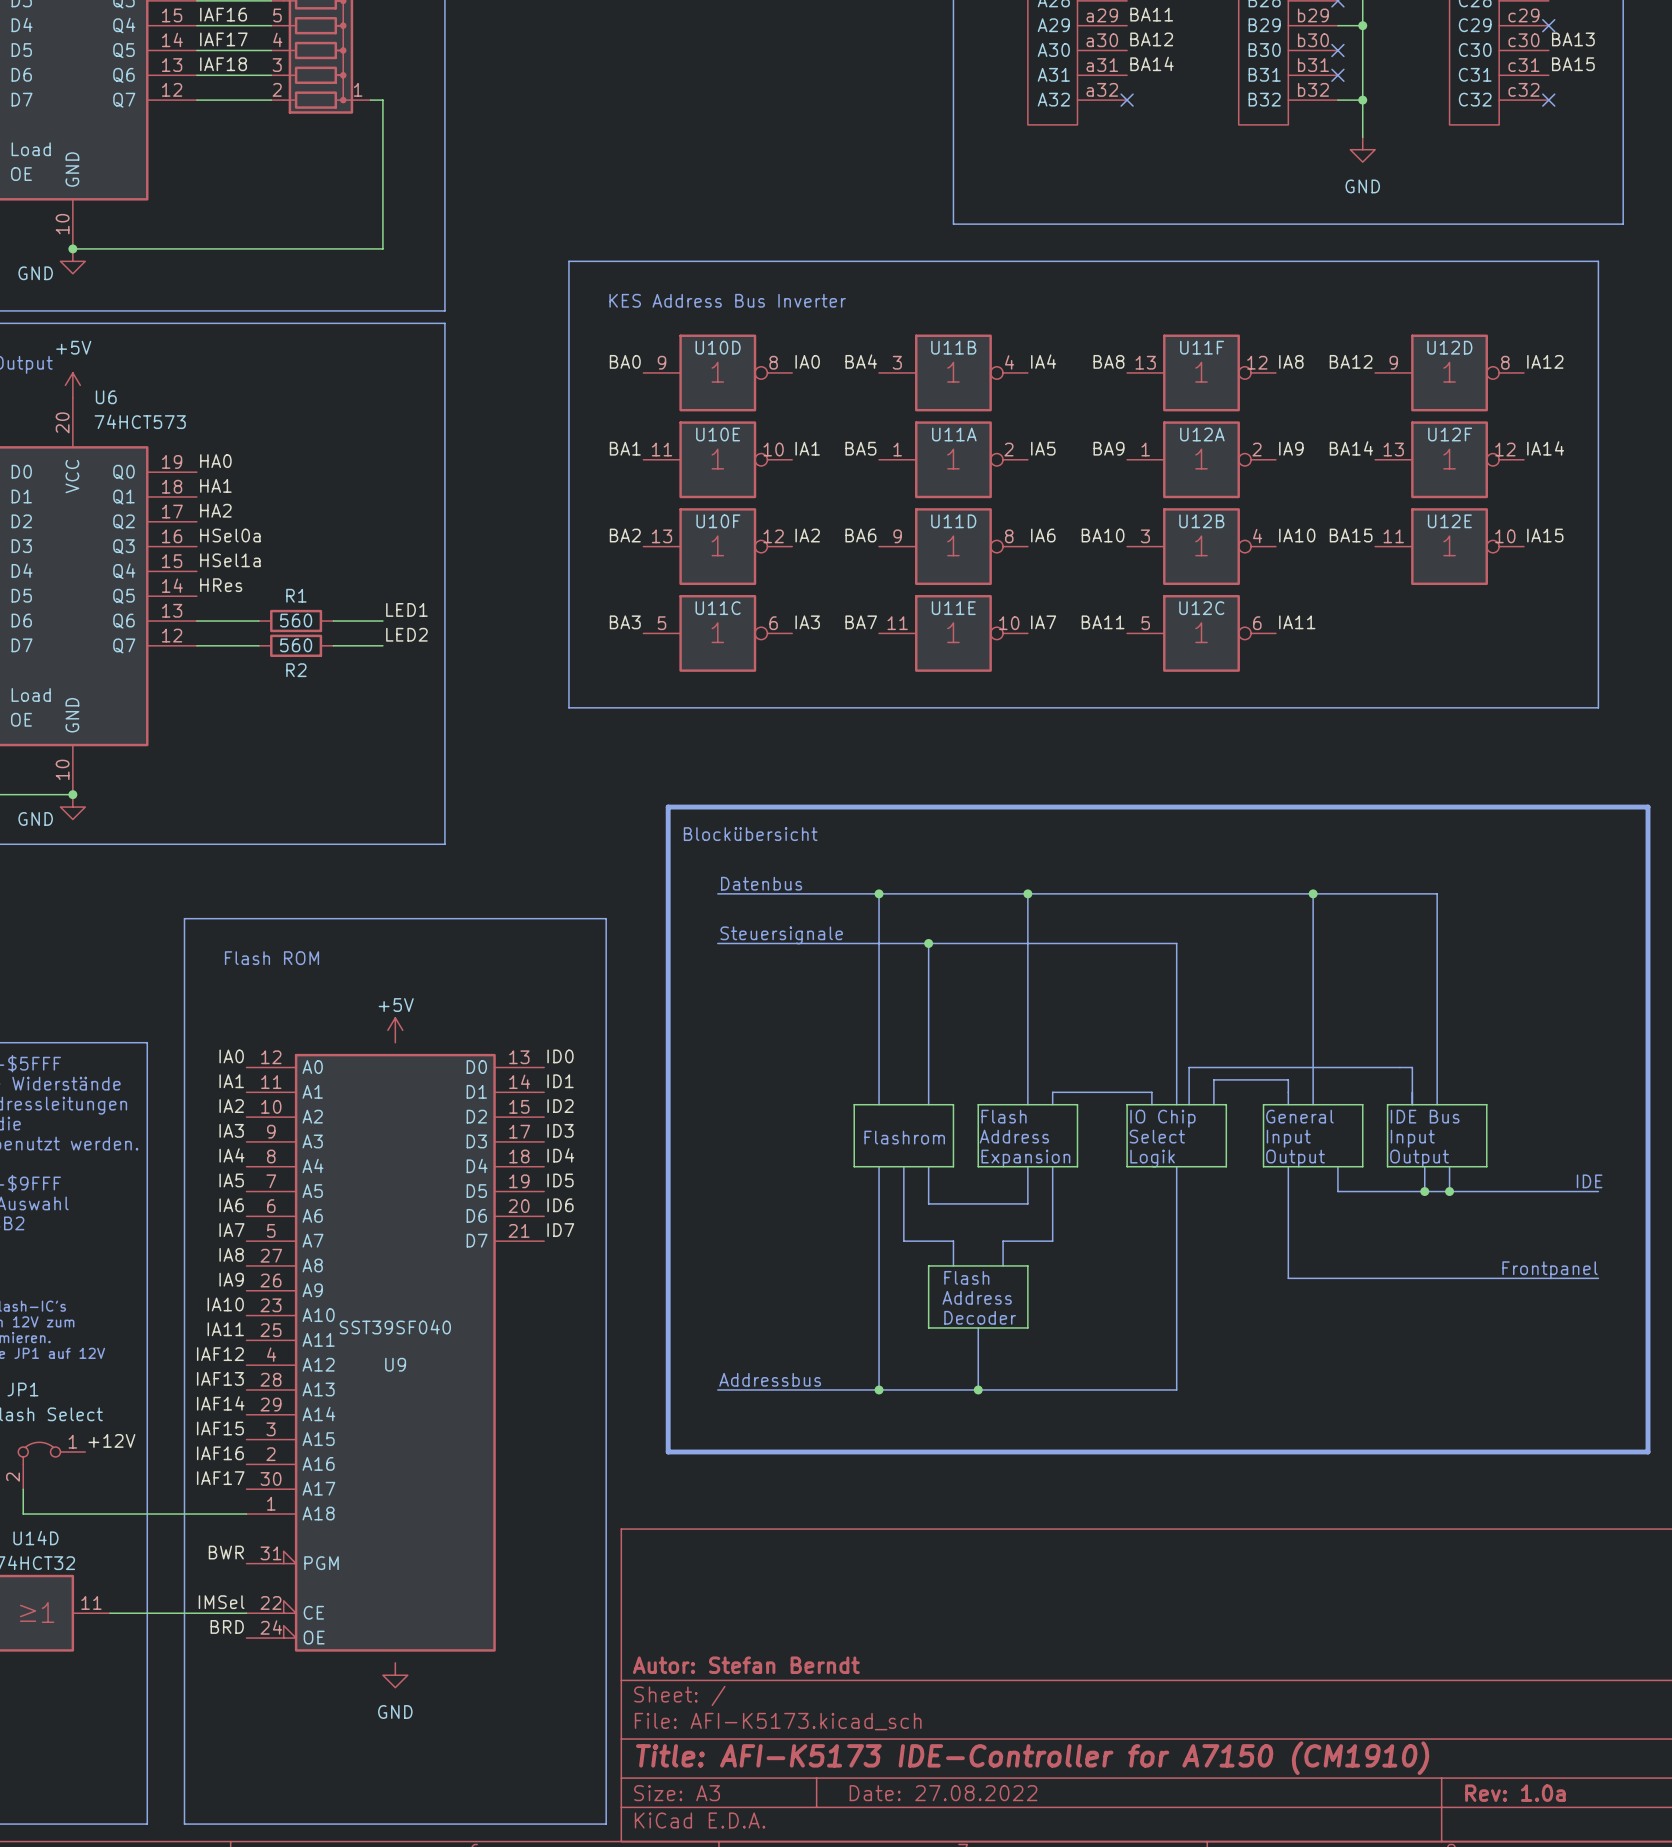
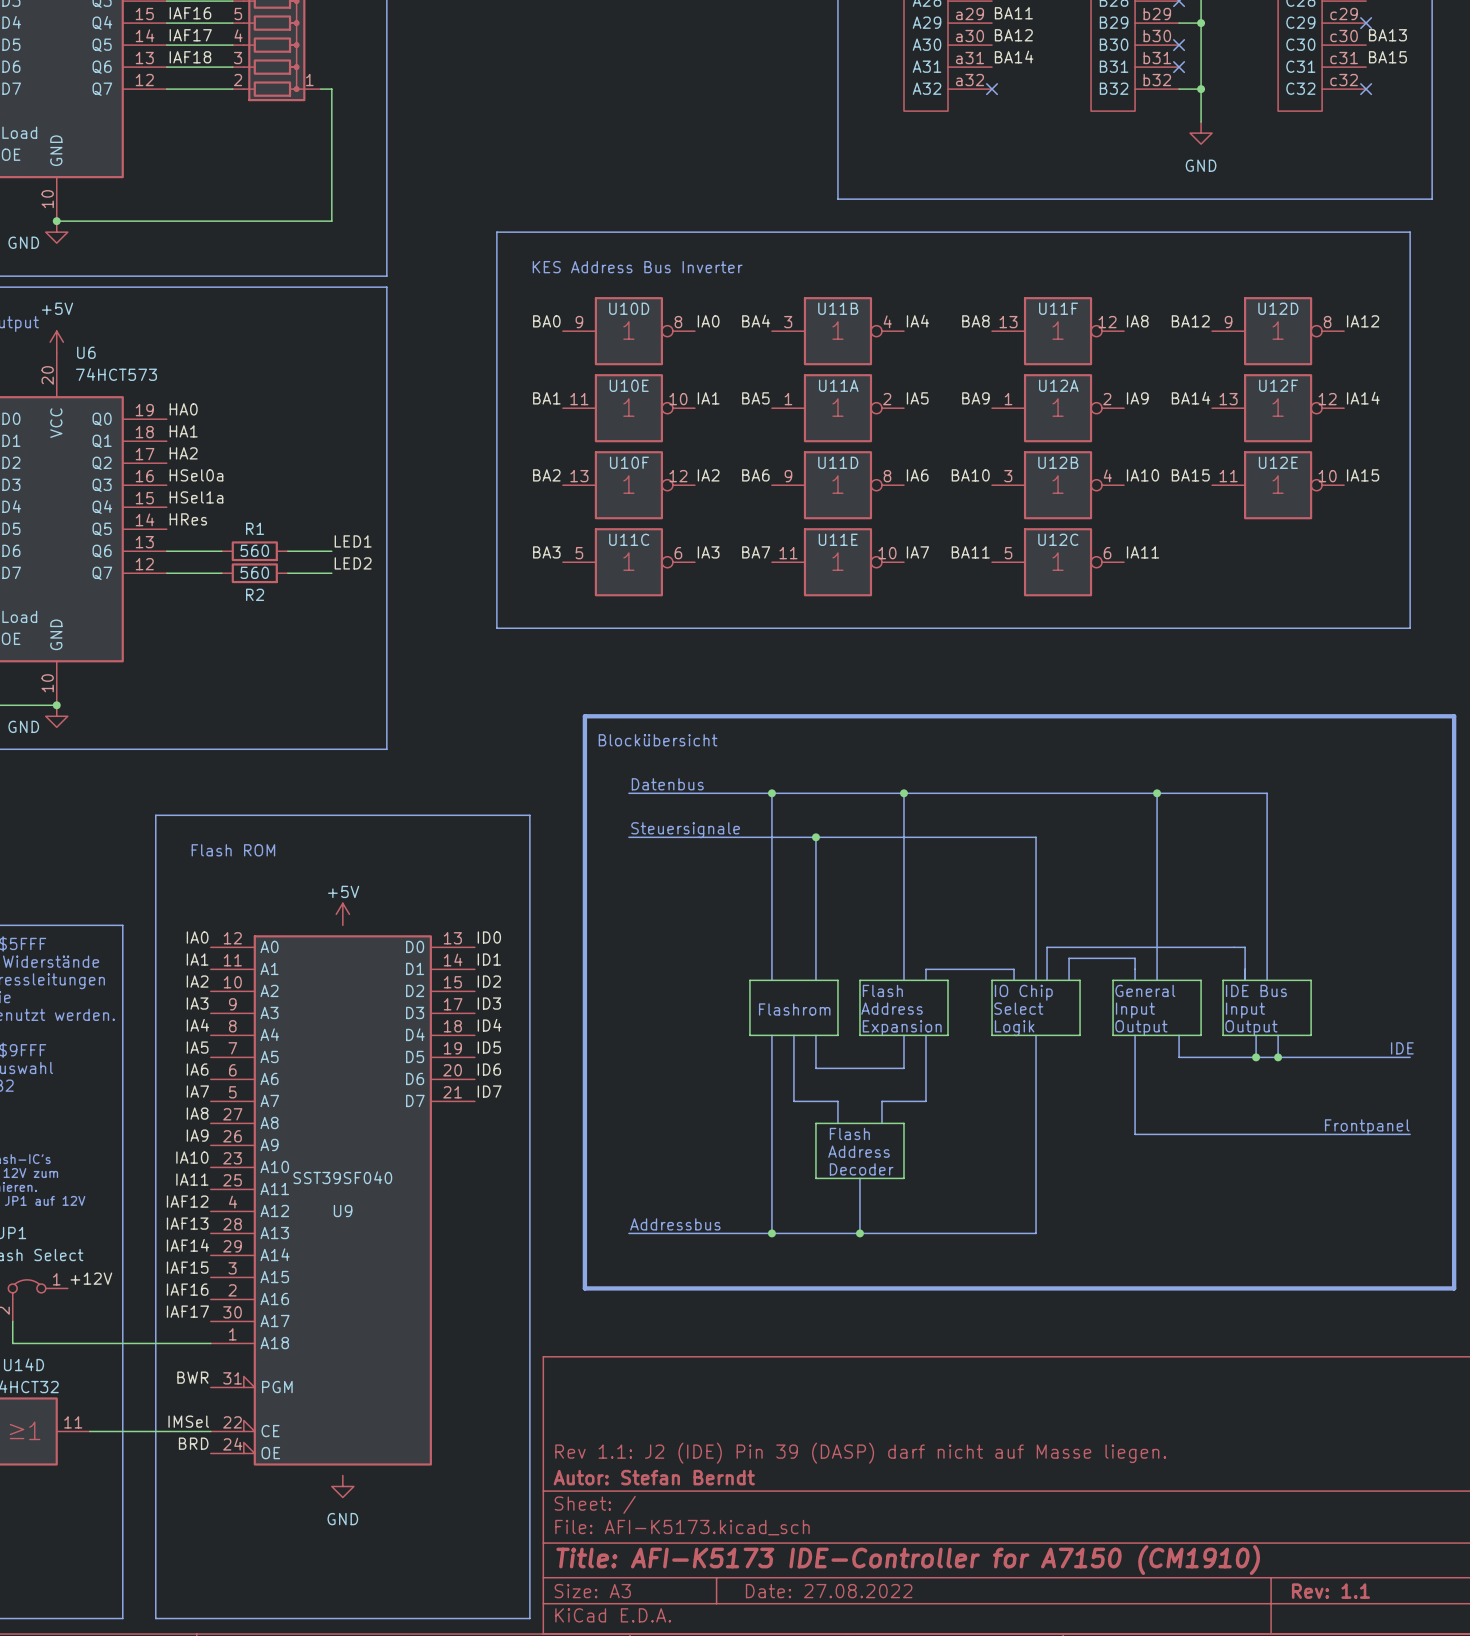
title block: none -> Rev 1.1: J2 (IDE) Pin 39 (DASP) darf nicht auf Masse liegen. (860, 1453)
title block: Rev: 1.0a (1515, 1793) -> Rev: 1.1 (1330, 1591)

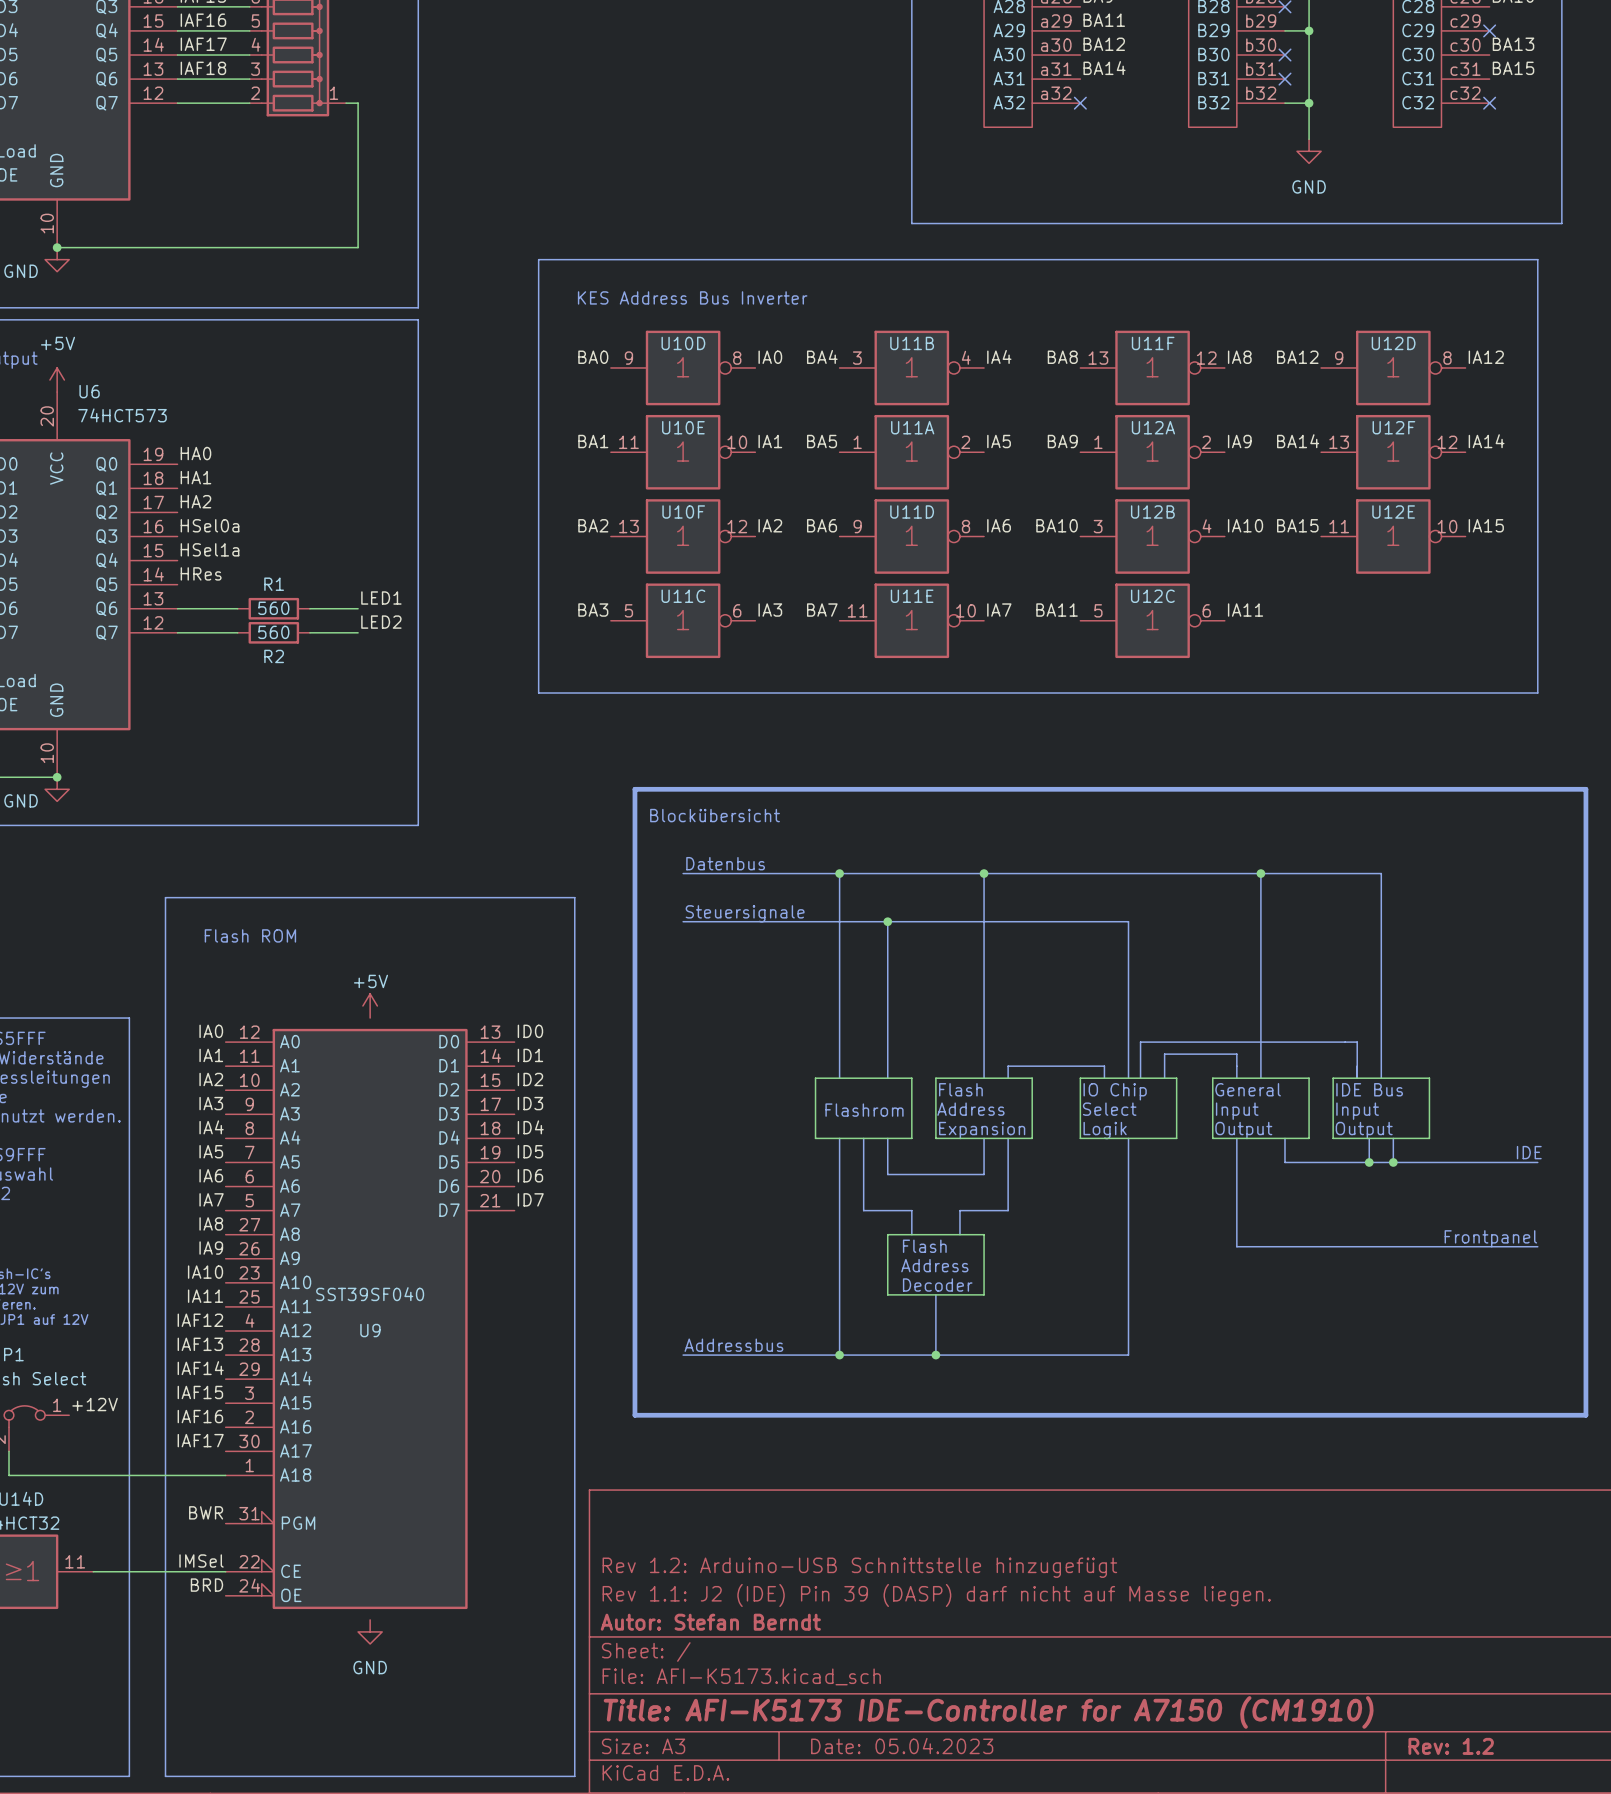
title block: none -> Rev 1.2: Arduino-USB Schnittstelle hinzugefügt (859, 1567)
title block: Date: 27.08.2022 (829, 1591) -> Date: 05.04.2023 (902, 1746)
title block: Rev: 1.1 (1330, 1591) -> Rev: 1.2 (1451, 1746)

